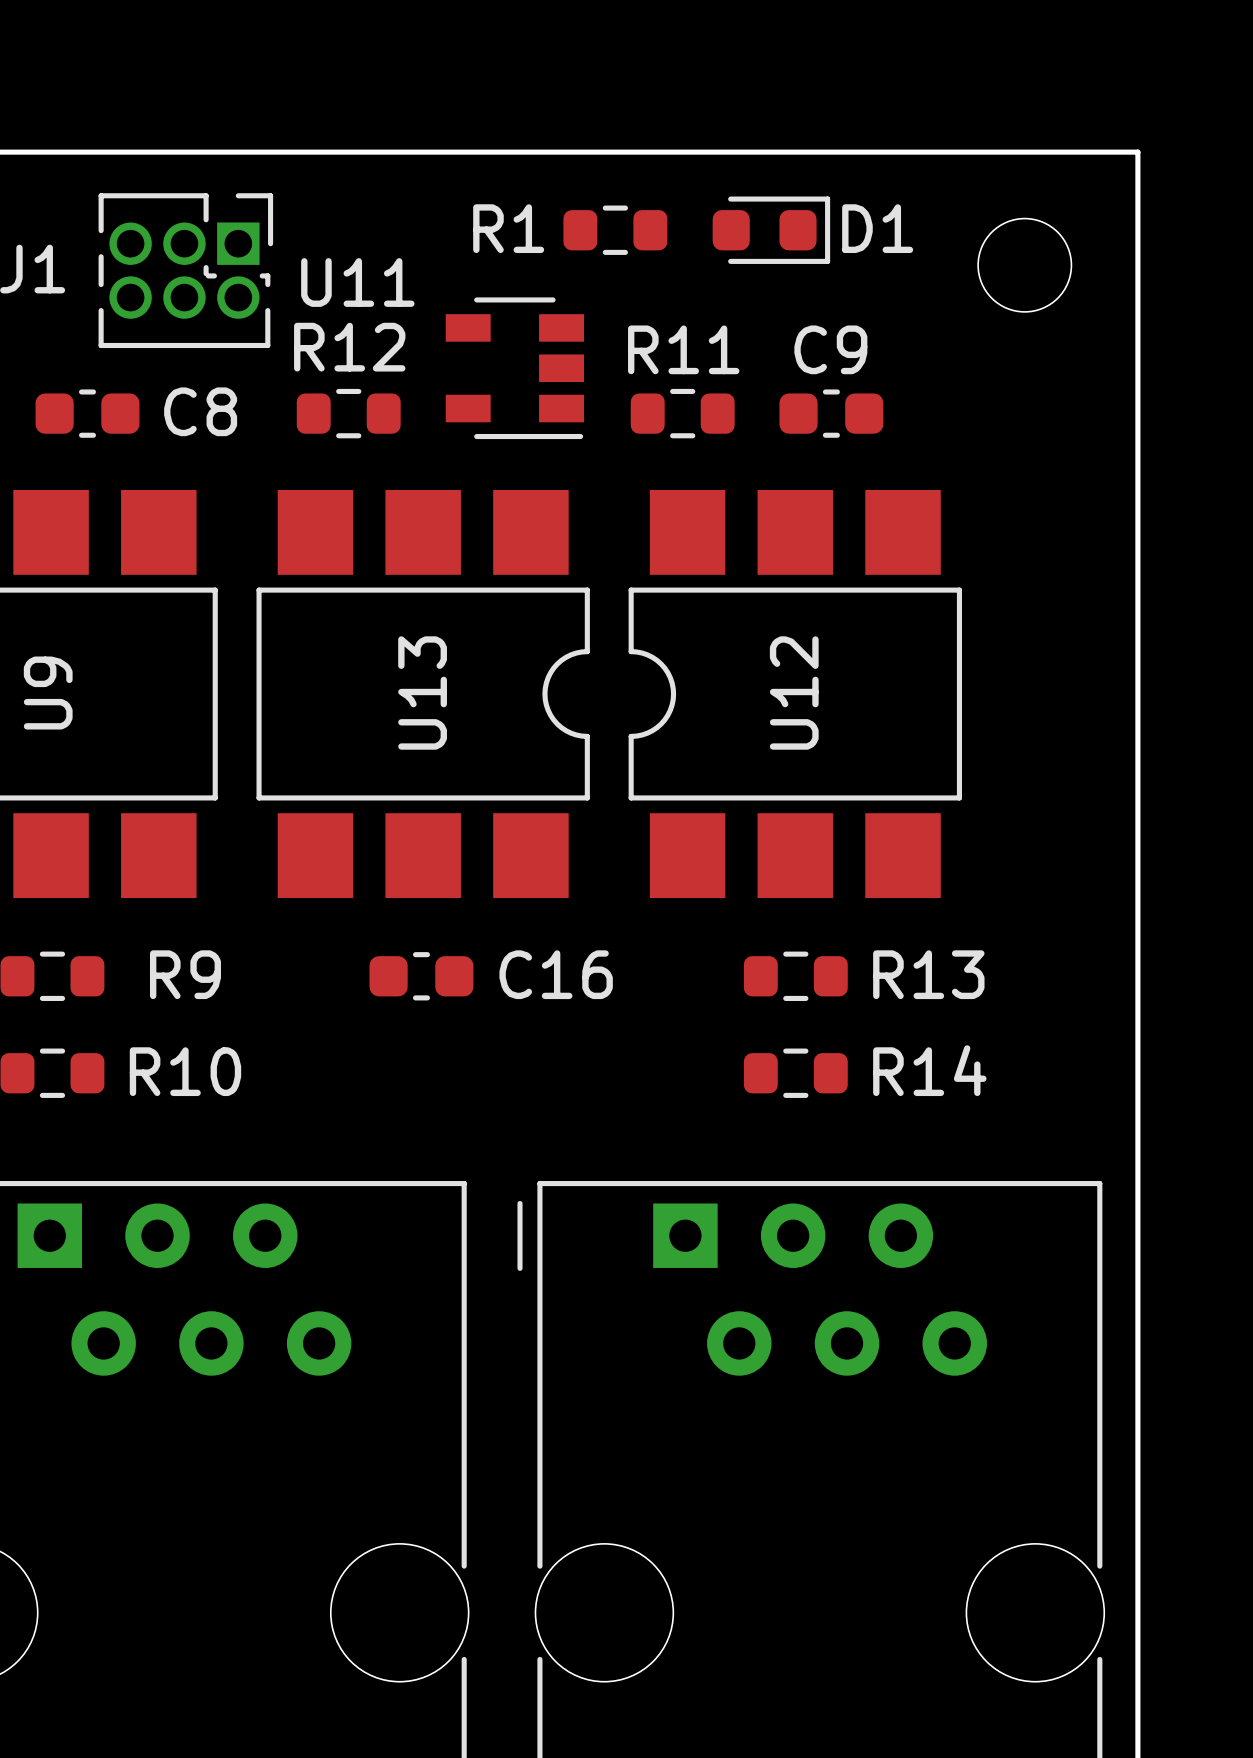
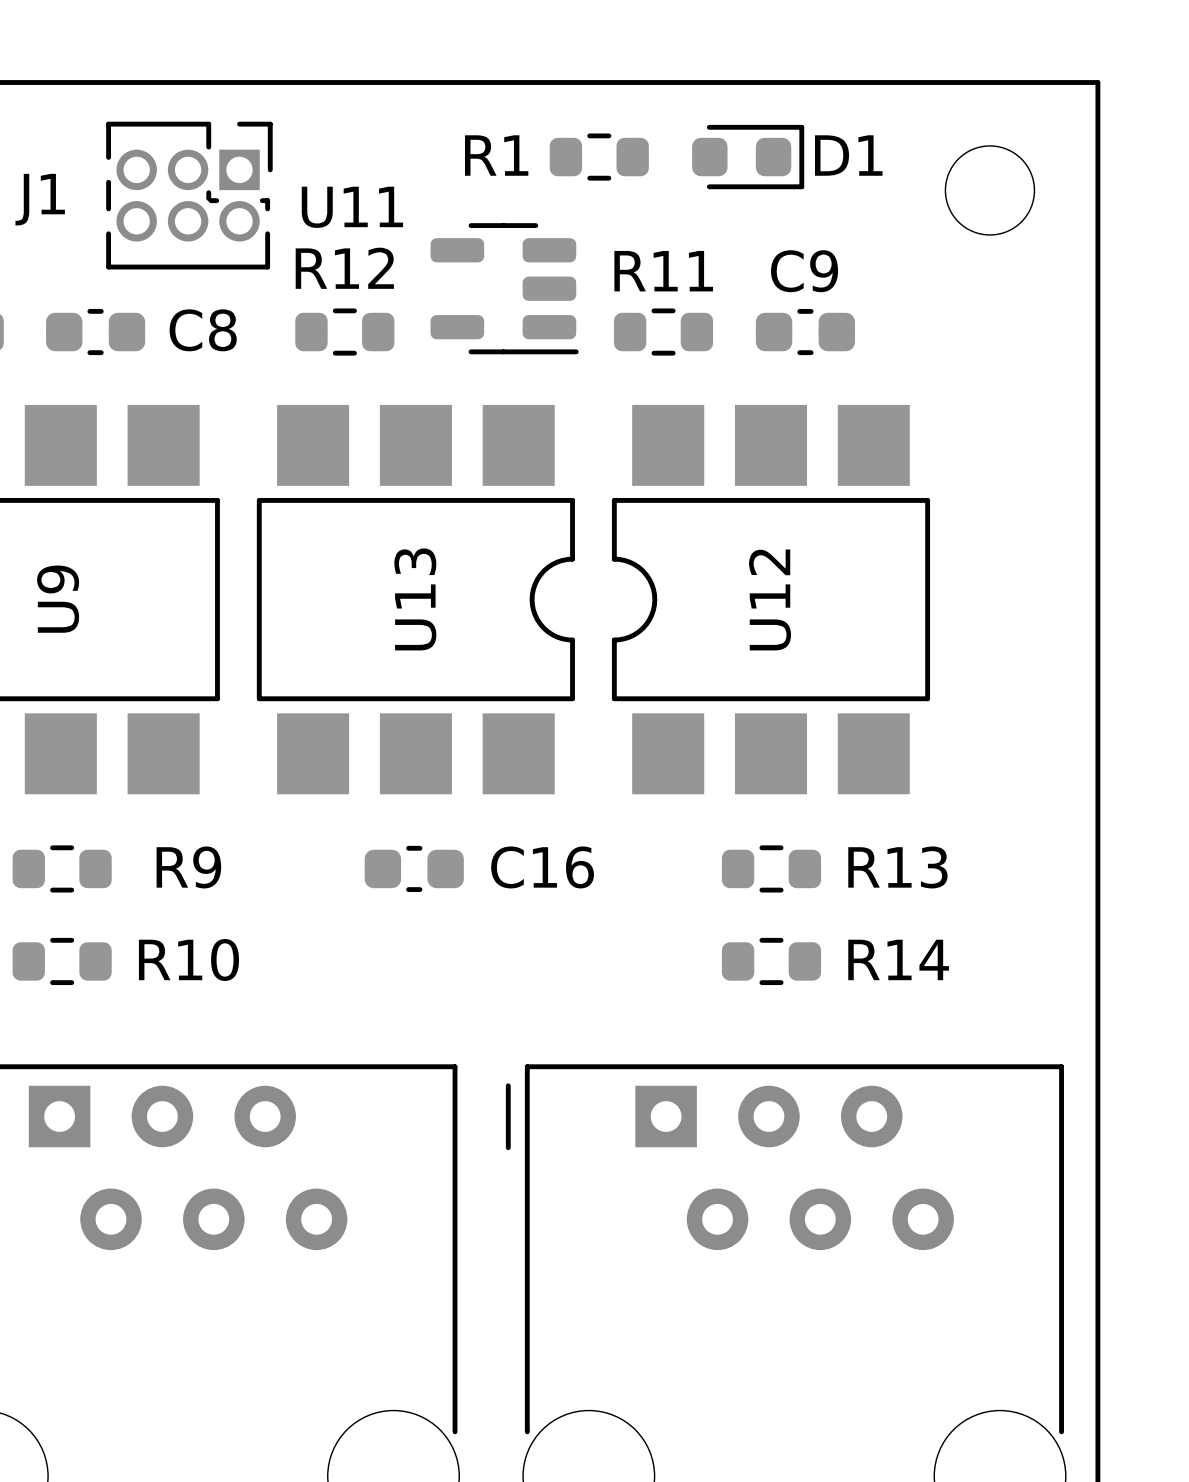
U11 footprint: [445, 297, 585, 440] -> [430, 223, 579, 355]

